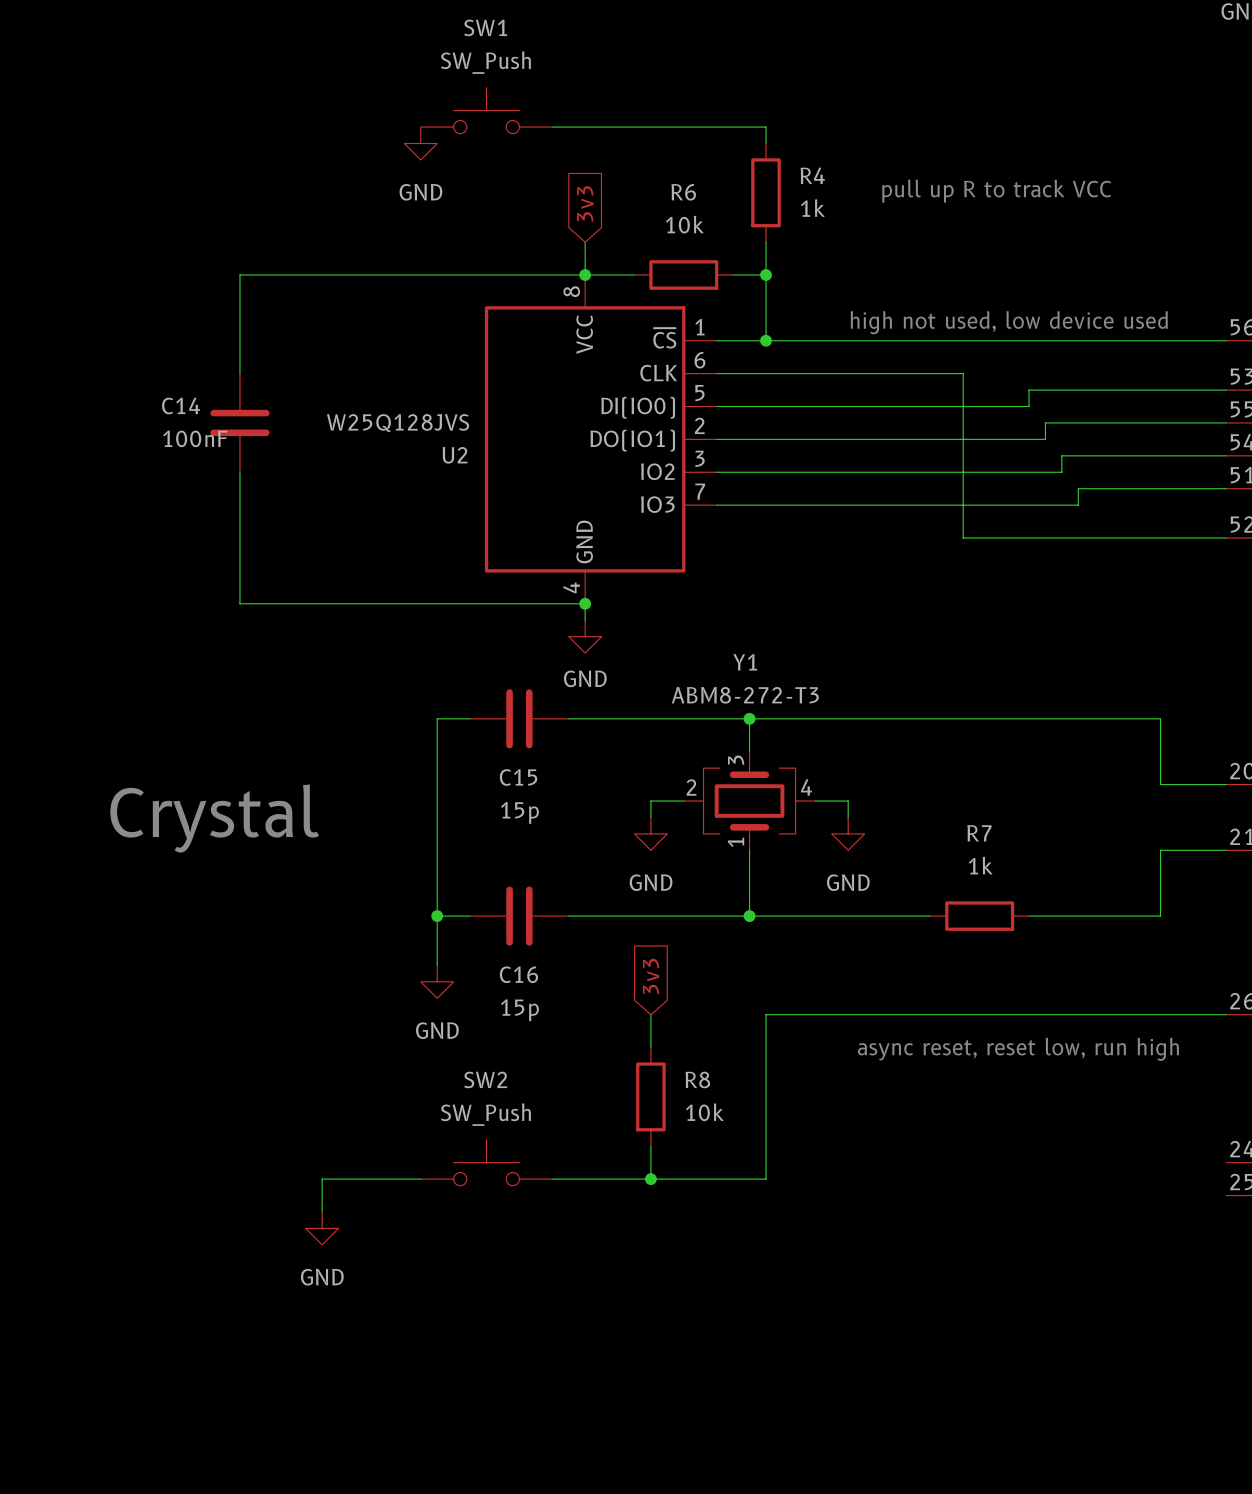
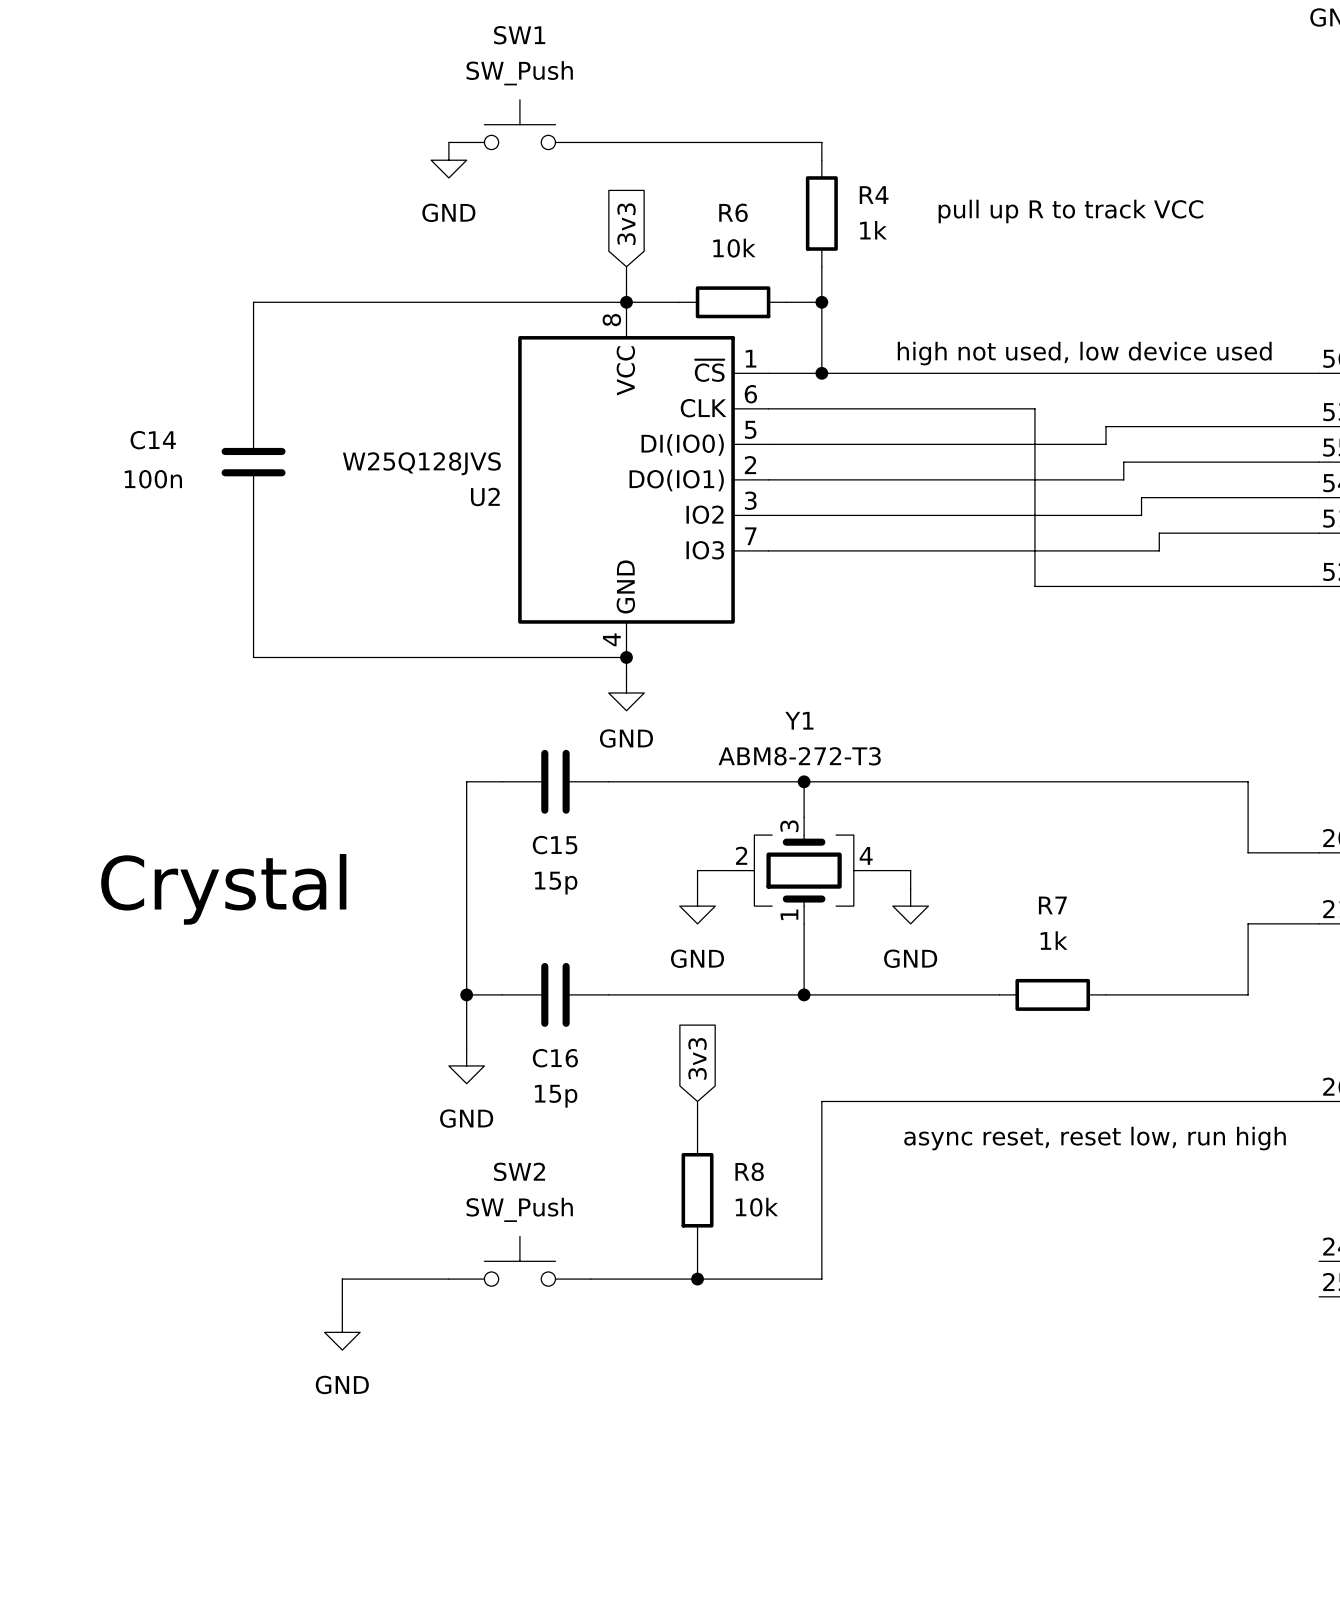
C14 name position: C14 (181, 405) -> C14 (153, 440)
C14 value: 100nF (195, 438) -> 100n (153, 479)

